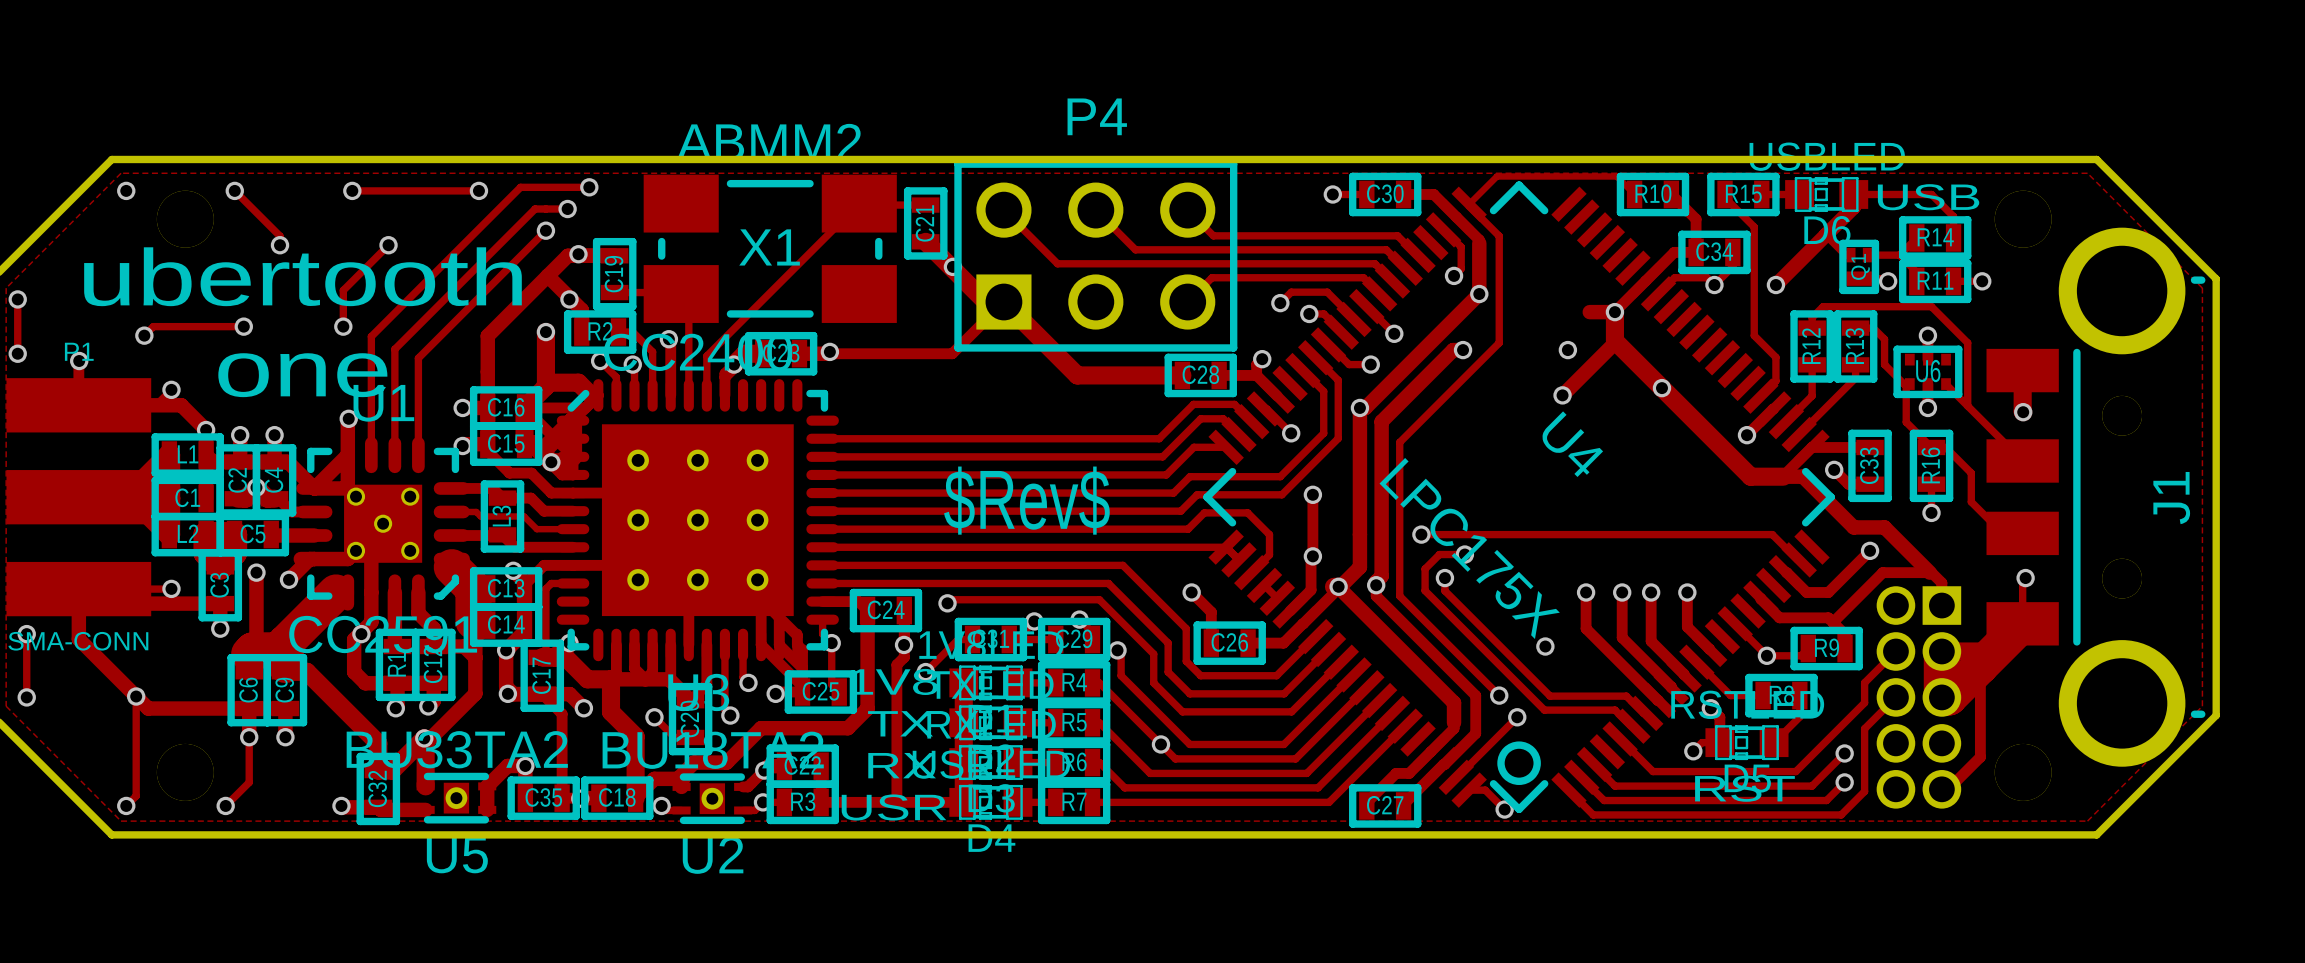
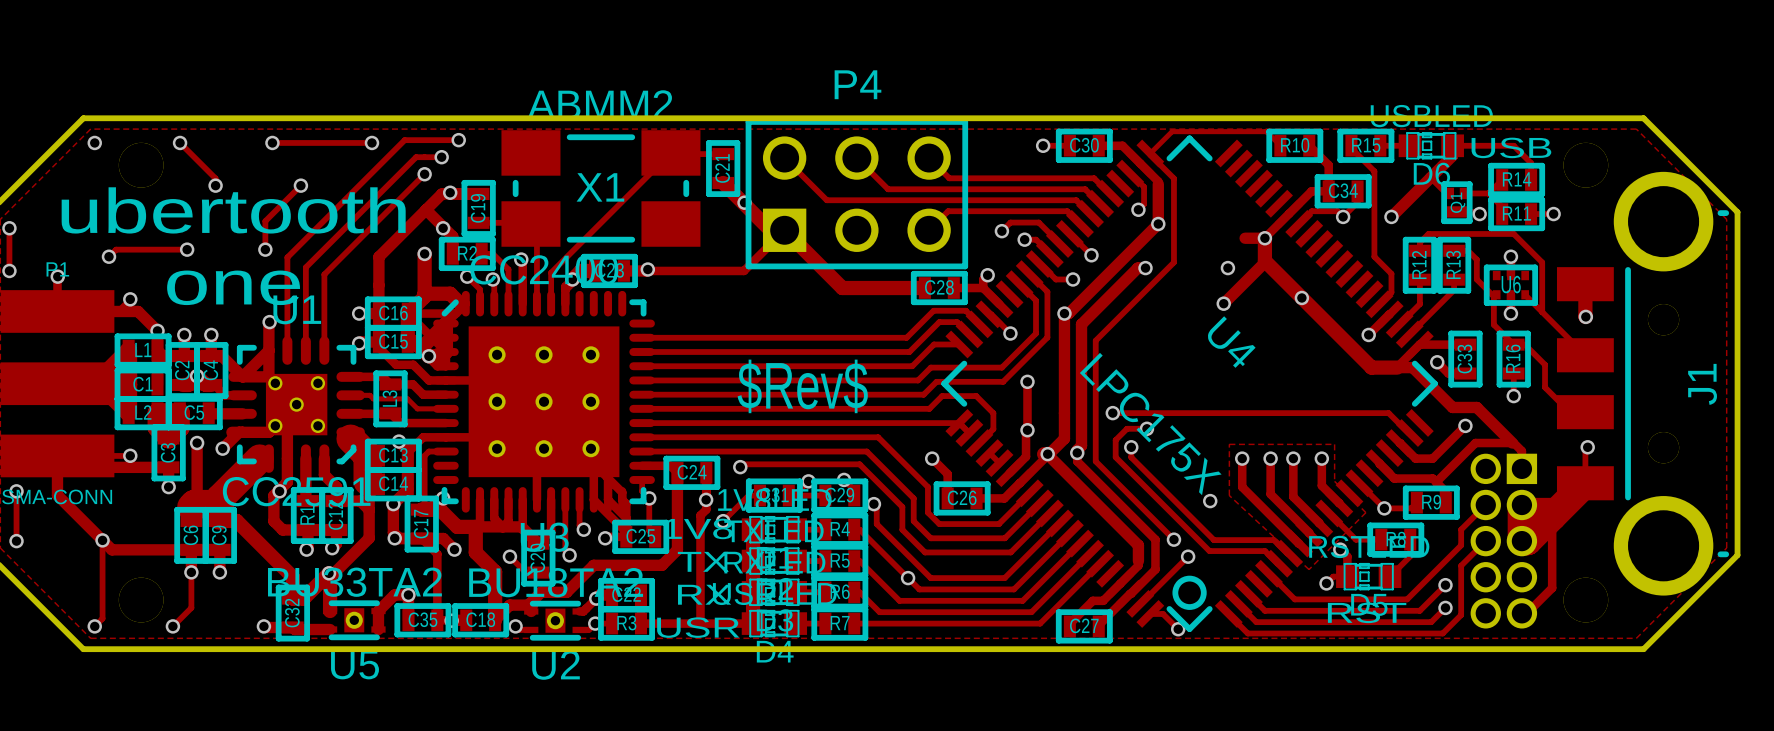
zone outline: none -> (1229, 444) (1229, 495) (1309, 569) (1365, 512) (1334, 481) (1334, 444) (1229, 444)

